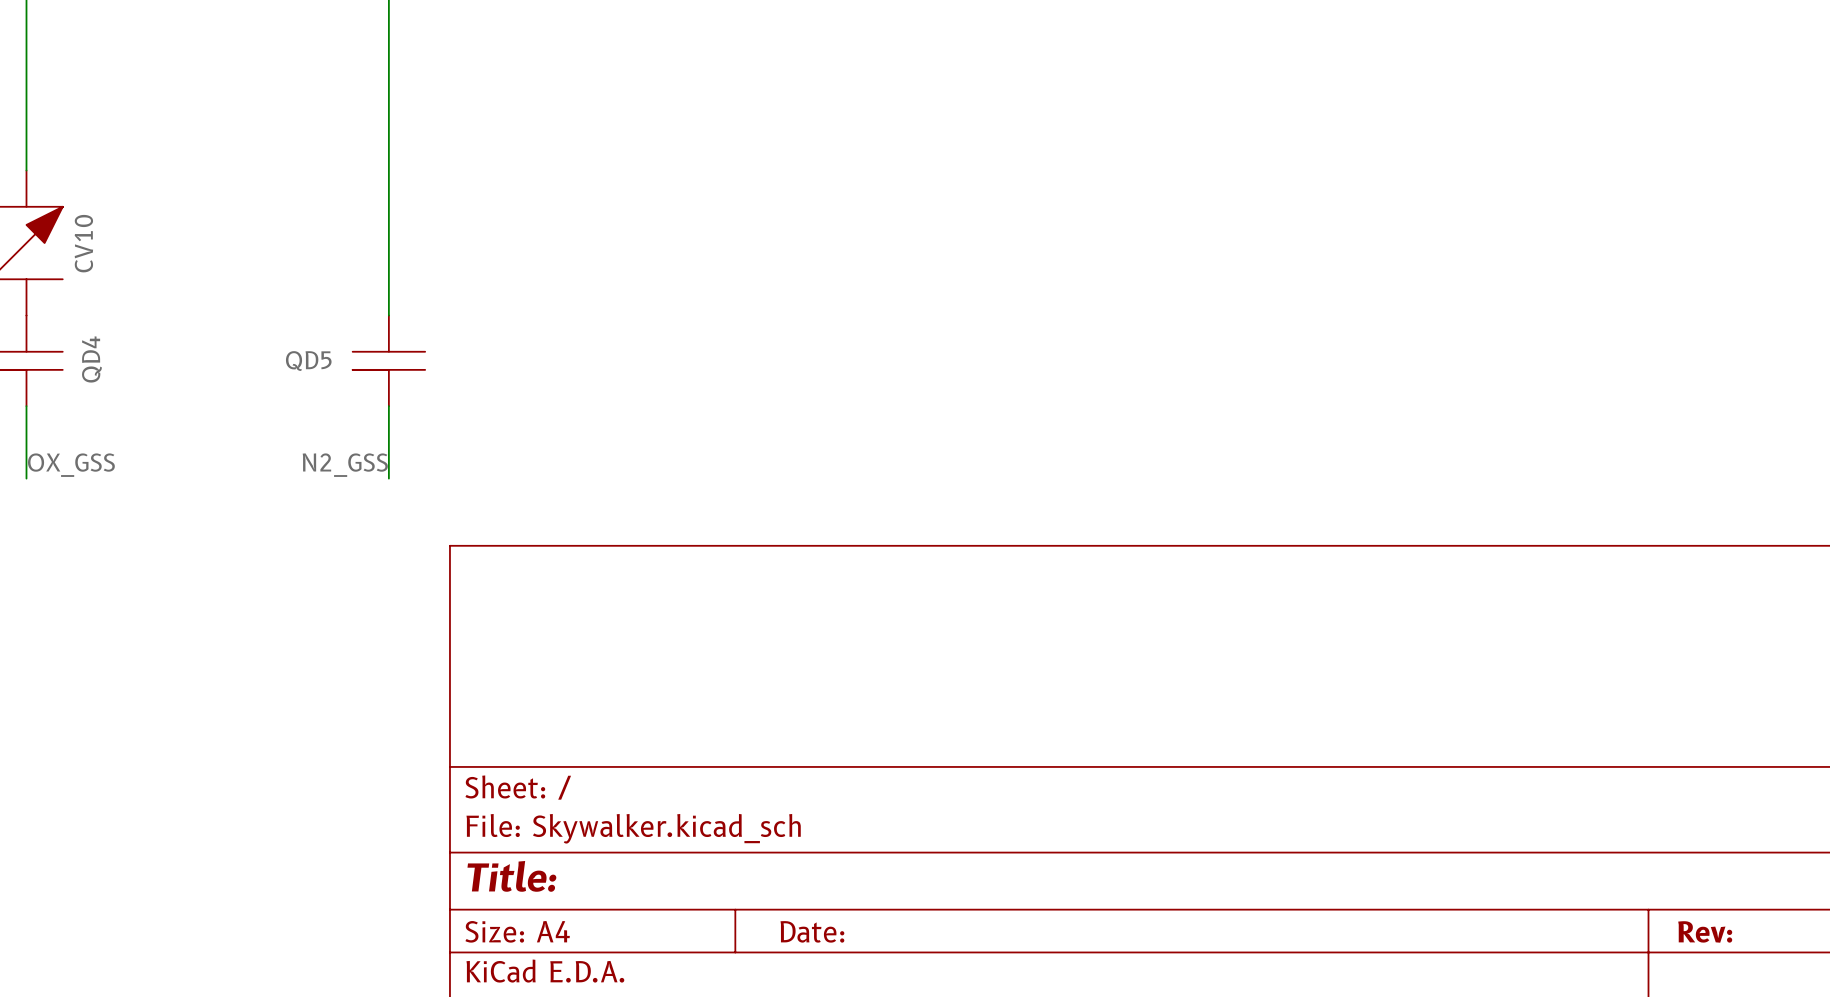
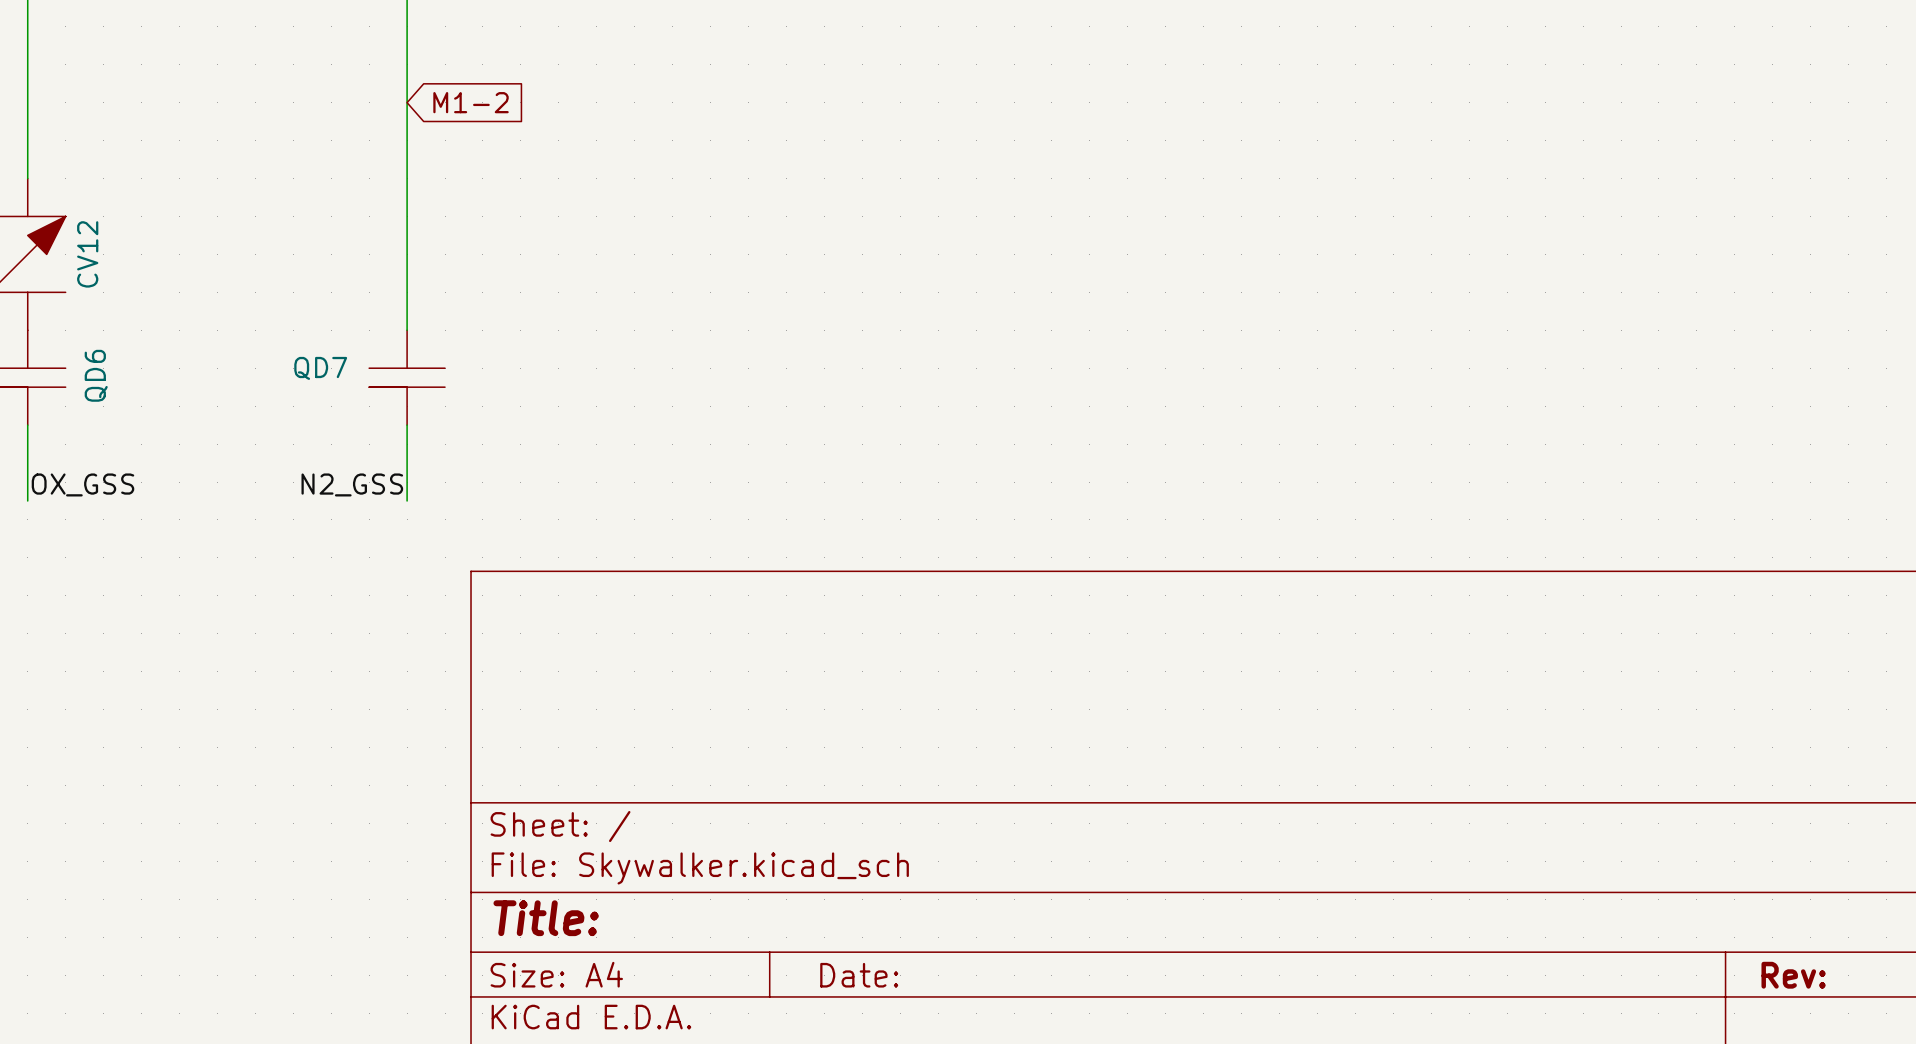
global label: none -> M1-2 (471, 102)
CV10 name: CV10 (83, 243) -> CV12 (87, 254)
QD4 name: QD4 (91, 359) -> QD6 (96, 375)
QD5 name: QD5 (308, 361) -> QD7 (320, 368)

